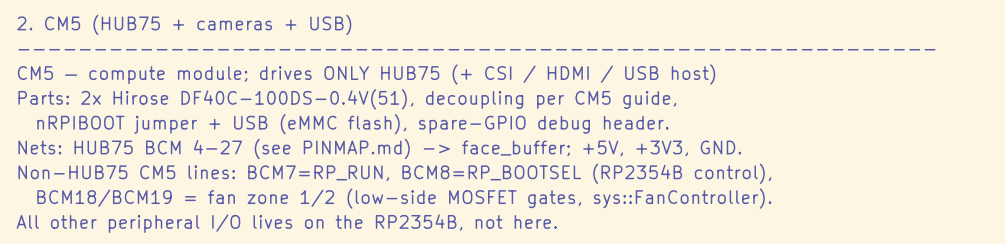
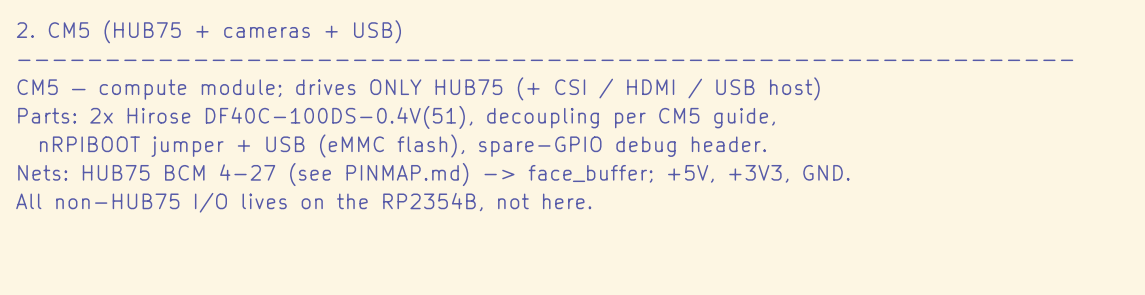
text: Non-HUB75 CM5 lines: BCM7=RP_RUN, BCM8=RP_BOOTSEL (RP2354B control), (394, 173) -> All non-HUB75 I/O lives on the RP2354B, not here. (303, 202)
text: BCM18/BCM19 = fan zone 1/2 (low-side MOSFET gates, sys::FanController). (404, 198) -> none
text: All other peripheral I/O lives on the RP2354B, not here. (286, 223) -> none

